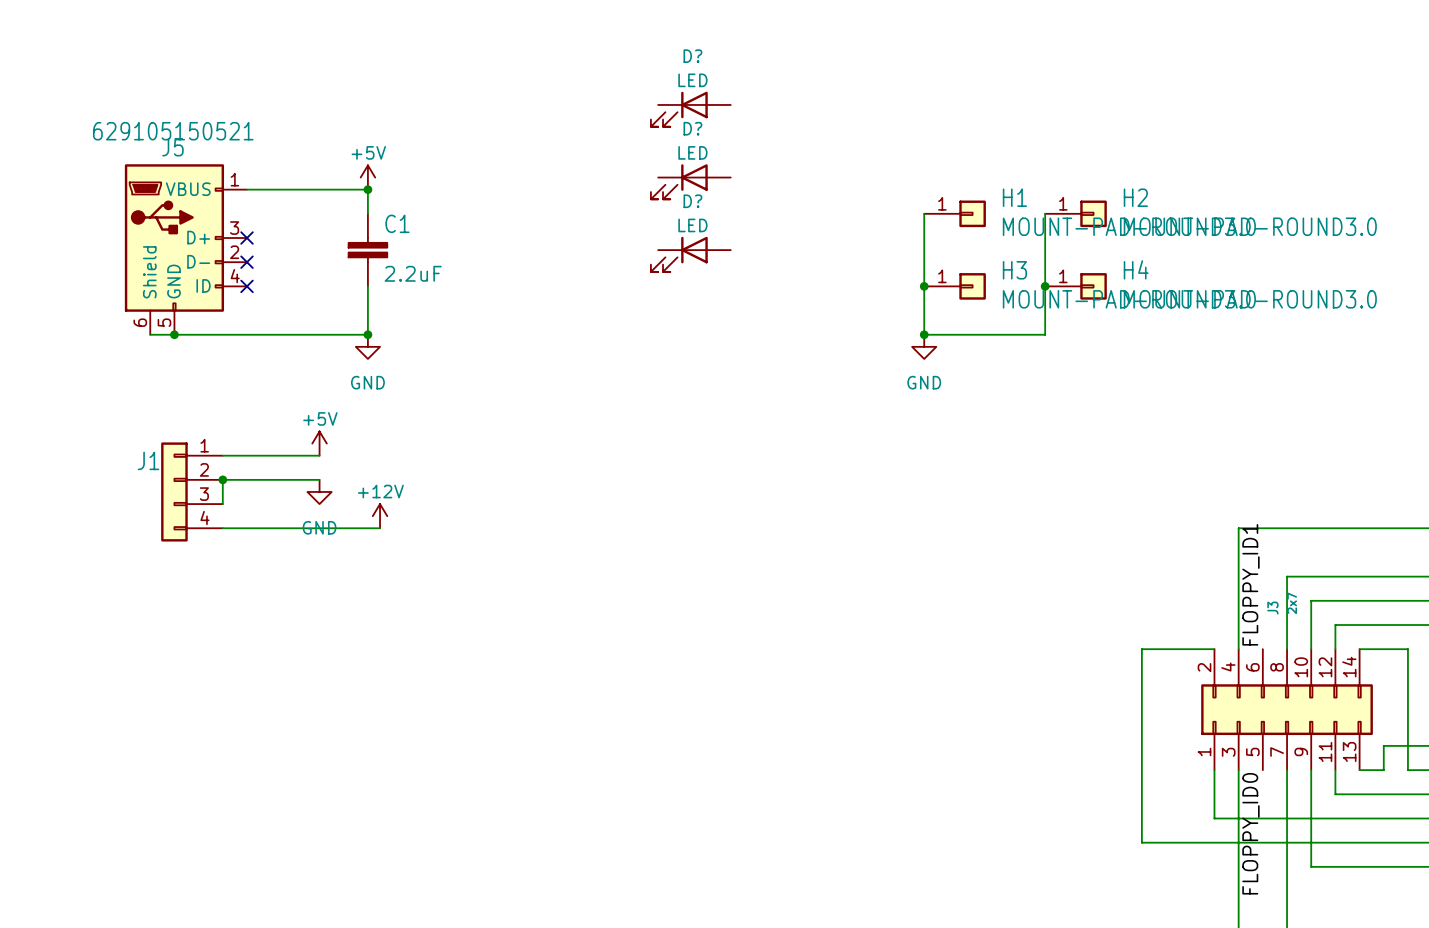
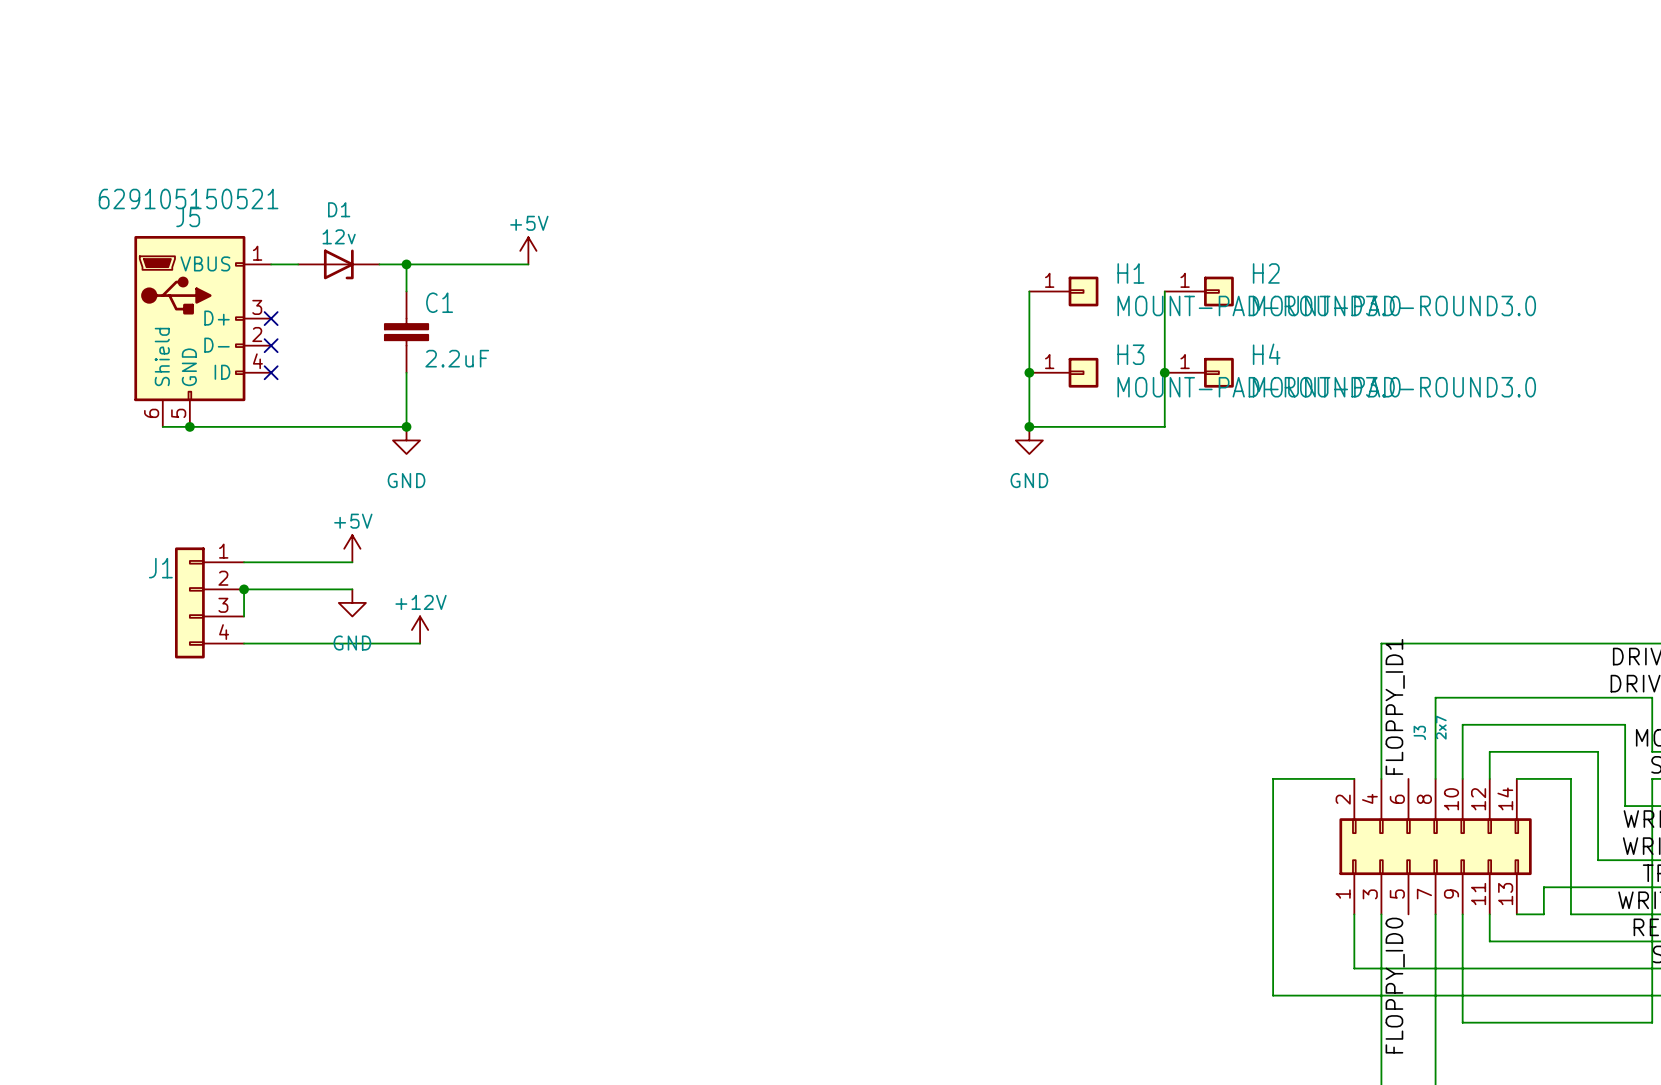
D?: LED (690, 109) -> none
power symbol position: +5V (367, 177) -> +5V (528, 250)
D?: LED (690, 181) -> none
D1: none -> 12v (338, 264)
wire: none -> (406, 264) (528, 264)
D?: LED (690, 254) -> none

